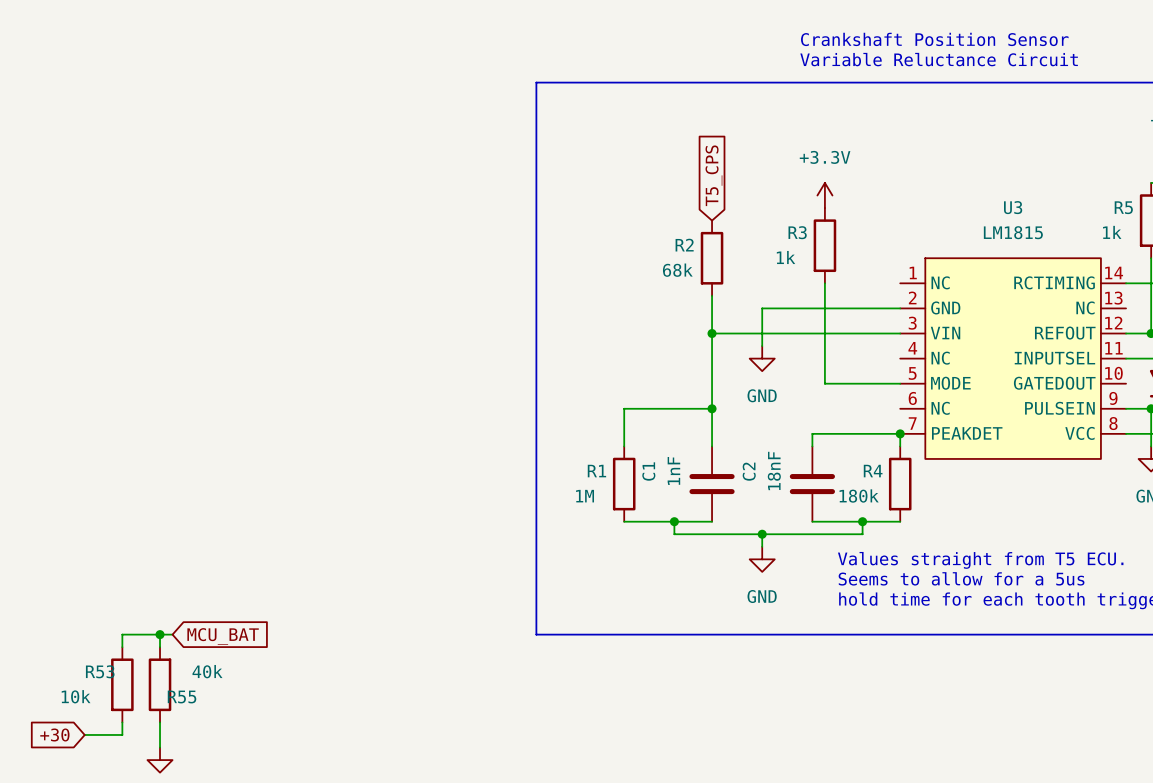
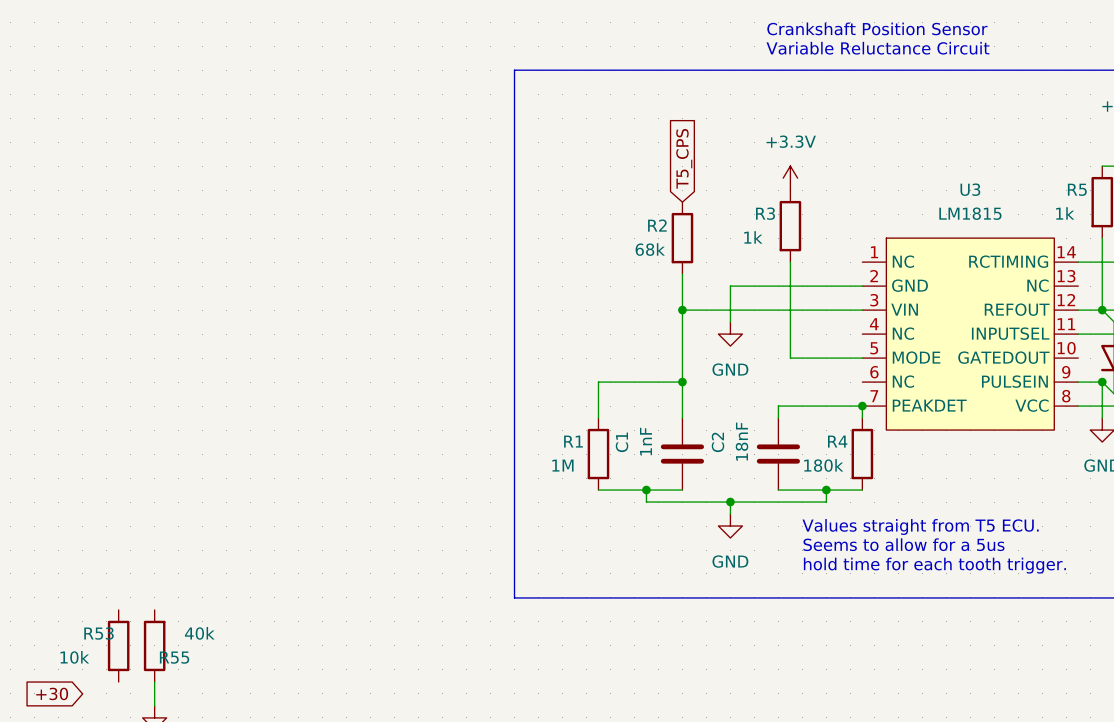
wire: (160, 634) (160, 647) -> none
junction: (160, 634) -> none
wire: (172, 634) (122, 634) (122, 647) -> none
global label: MCU_BAT (223, 636) -> none
wire: (122, 722) (122, 734) (84, 734) -> none

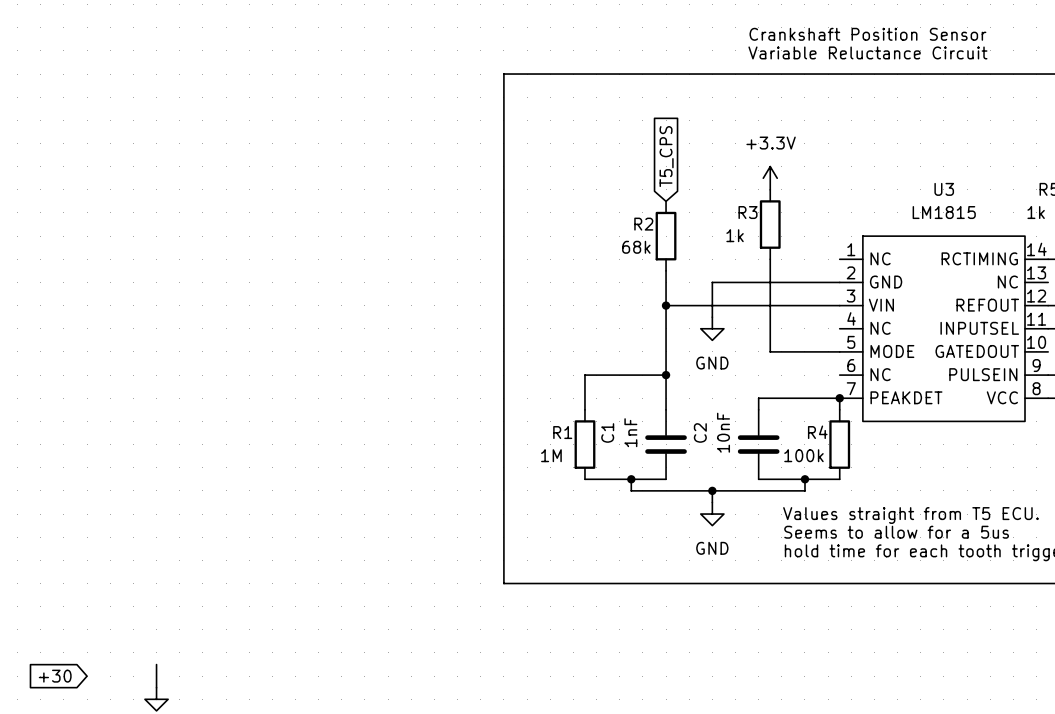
C2 value: 18nF (741, 441) -> 10nF (723, 432)
R4 value: 180k (823, 465) -> 100k (803, 455)
R53: 10k (118, 645) -> none
R55: 40k (154, 645) -> none

